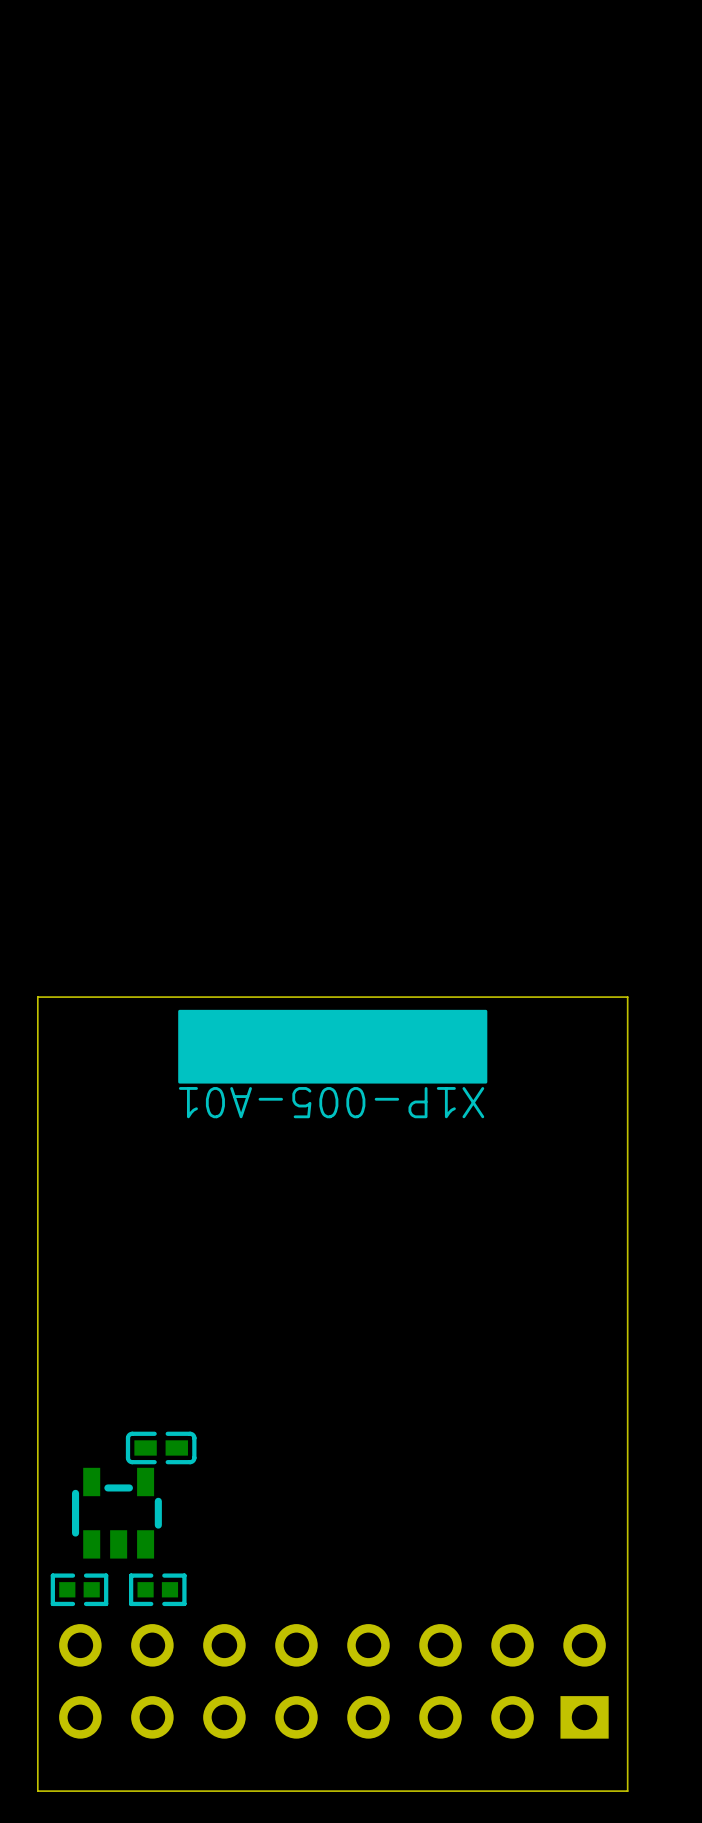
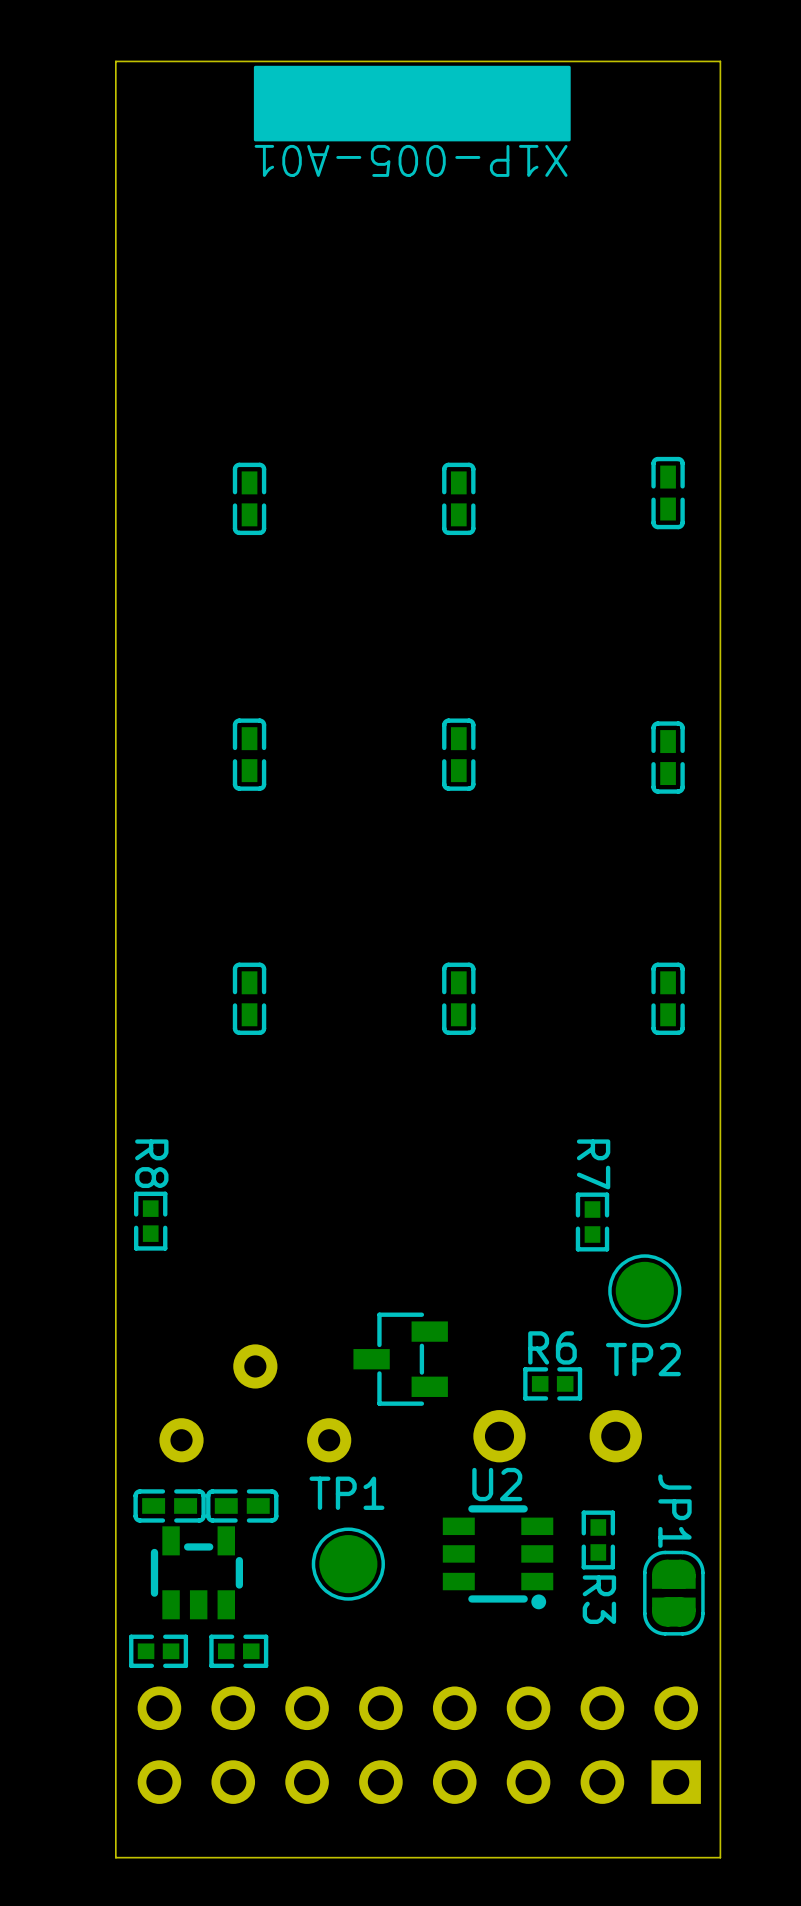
drawing: none -> [253, 65, 571, 142]
text: none -> X1P-005-A01 (411, 160)
part: none -> (668, 493)
part: none -> (249, 498)
part: none -> (458, 498)
part: none -> (249, 754)
part: none -> (458, 754)
part: none -> (668, 757)
part: none -> (249, 998)
part: none -> (458, 998)
part: none -> (668, 998)
board edge: (627, 997) (37, 997) -> (720, 1043) (720, 61) (115, 61) (115, 1043)
drawing: [178, 1009, 488, 1084] -> none
text: X1P-005-A01 (331, 1102) -> none
R8: none -> (150, 1221)
R7: none -> (592, 1222)
TP2: none -> (644, 1290)
part: none -> (400, 1359)
R6: none -> (552, 1383)
part: none -> (255, 1403)
part: none -> (557, 1436)
part: none -> (169, 1505)
R3: none -> (598, 1539)
U2: none -> (498, 1557)
TP1: none -> (348, 1564)
JP1: none -> (673, 1593)

